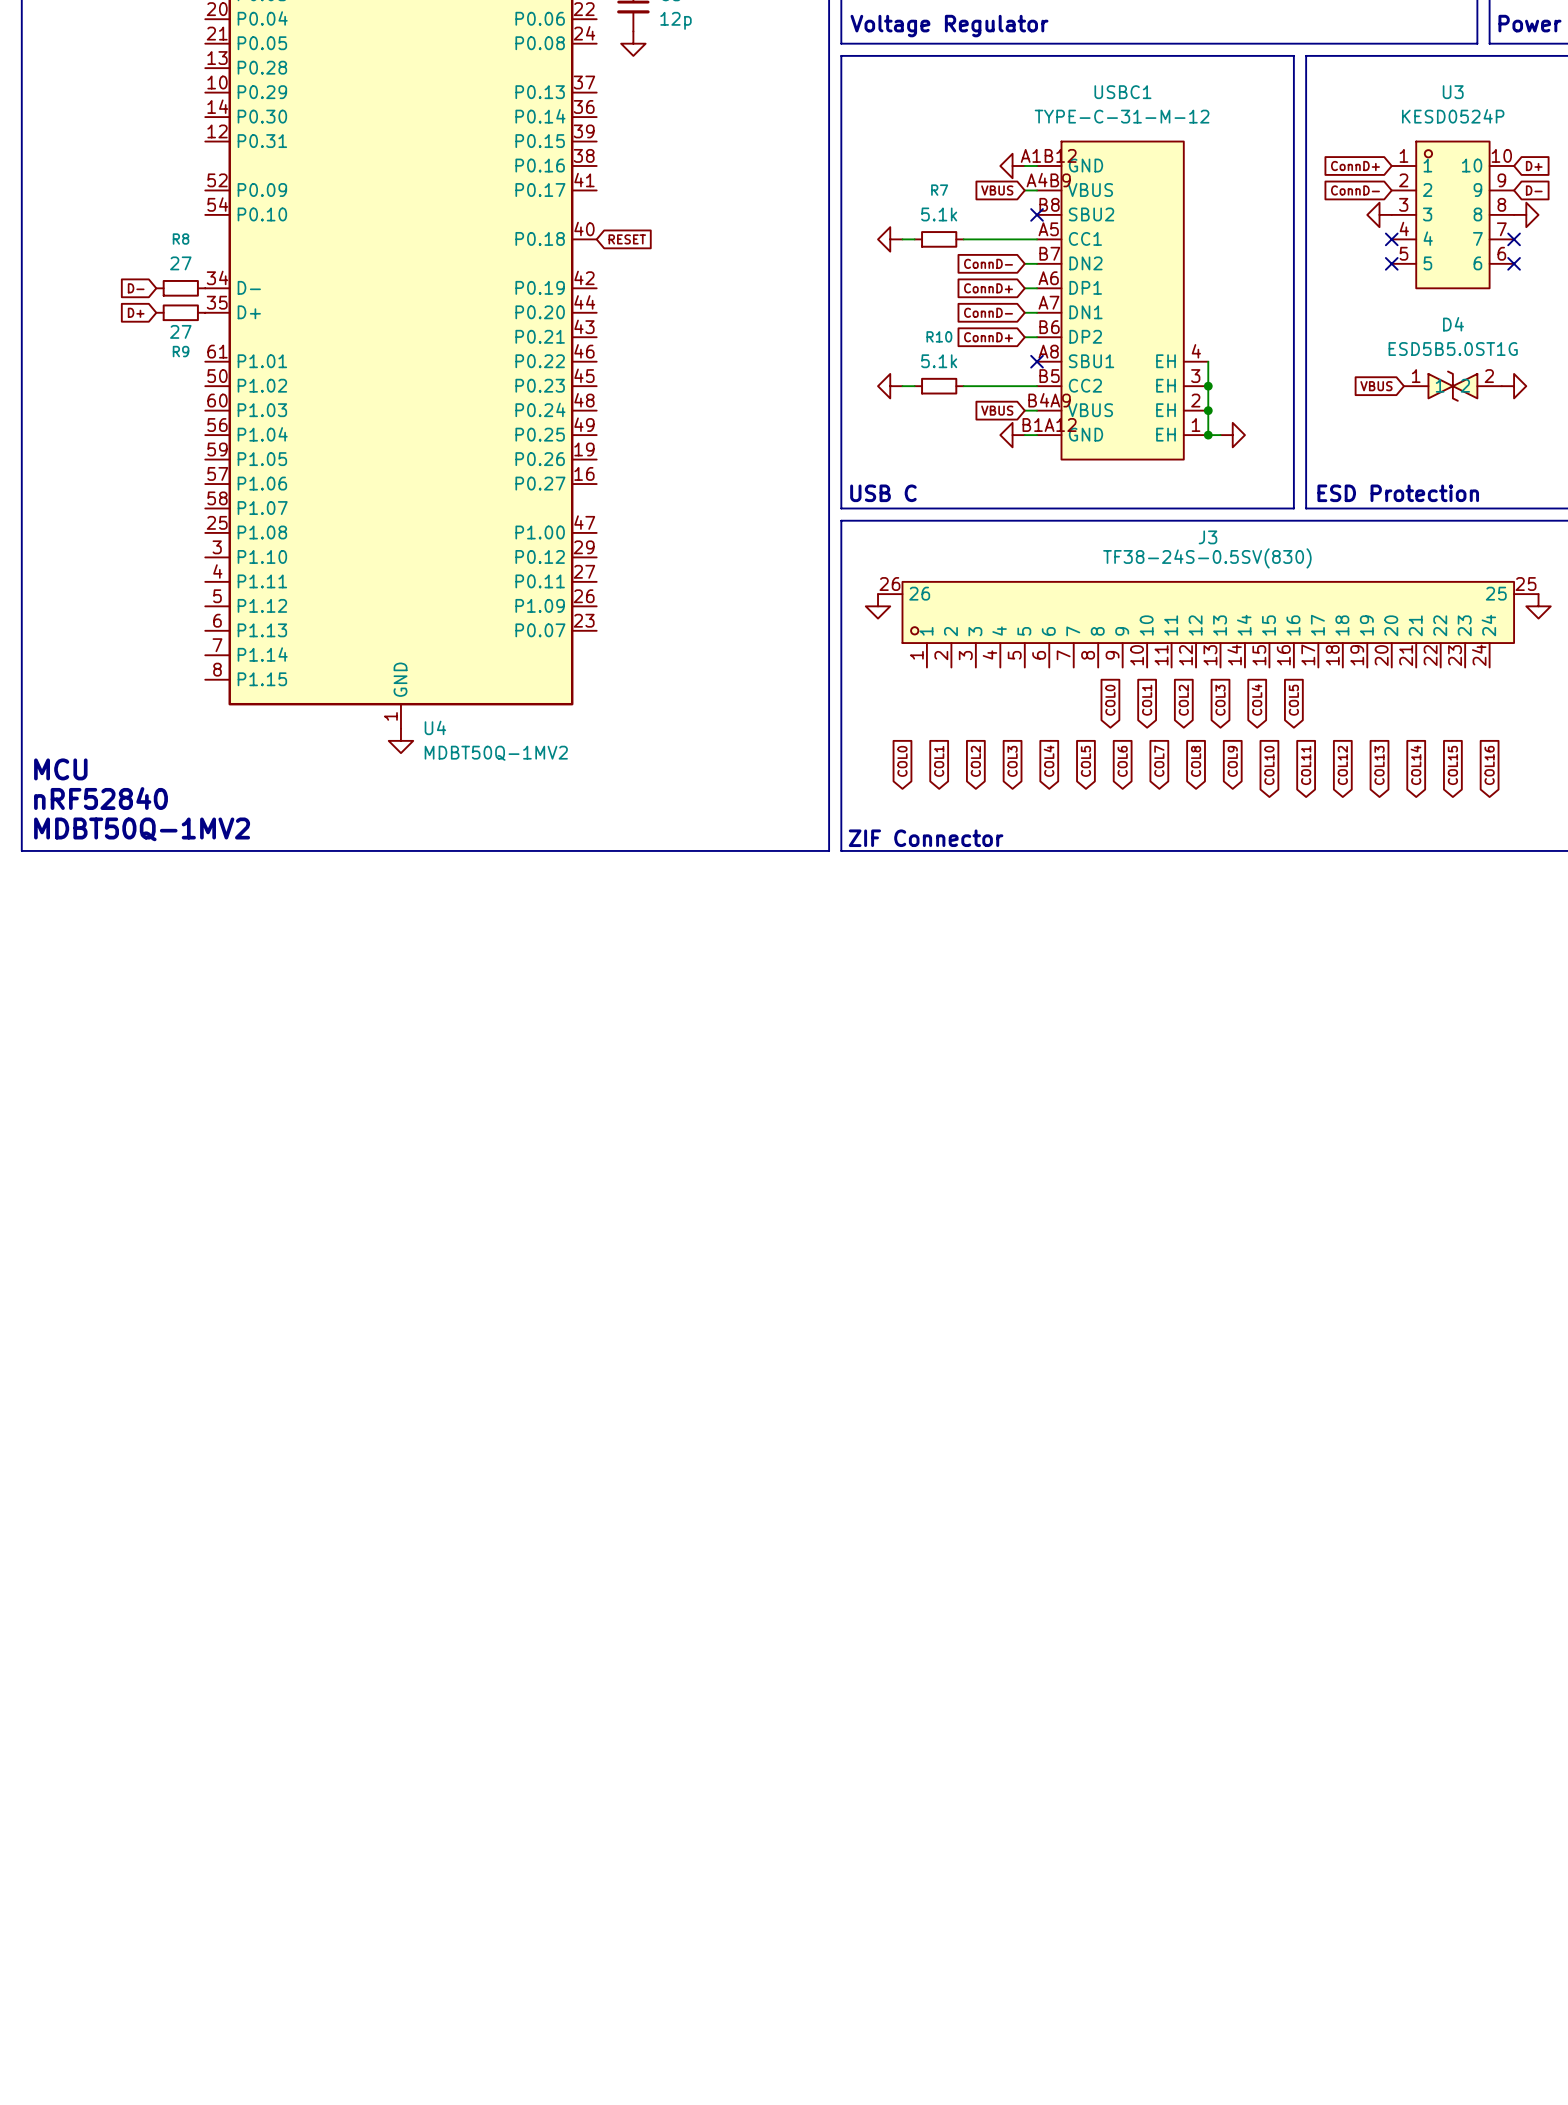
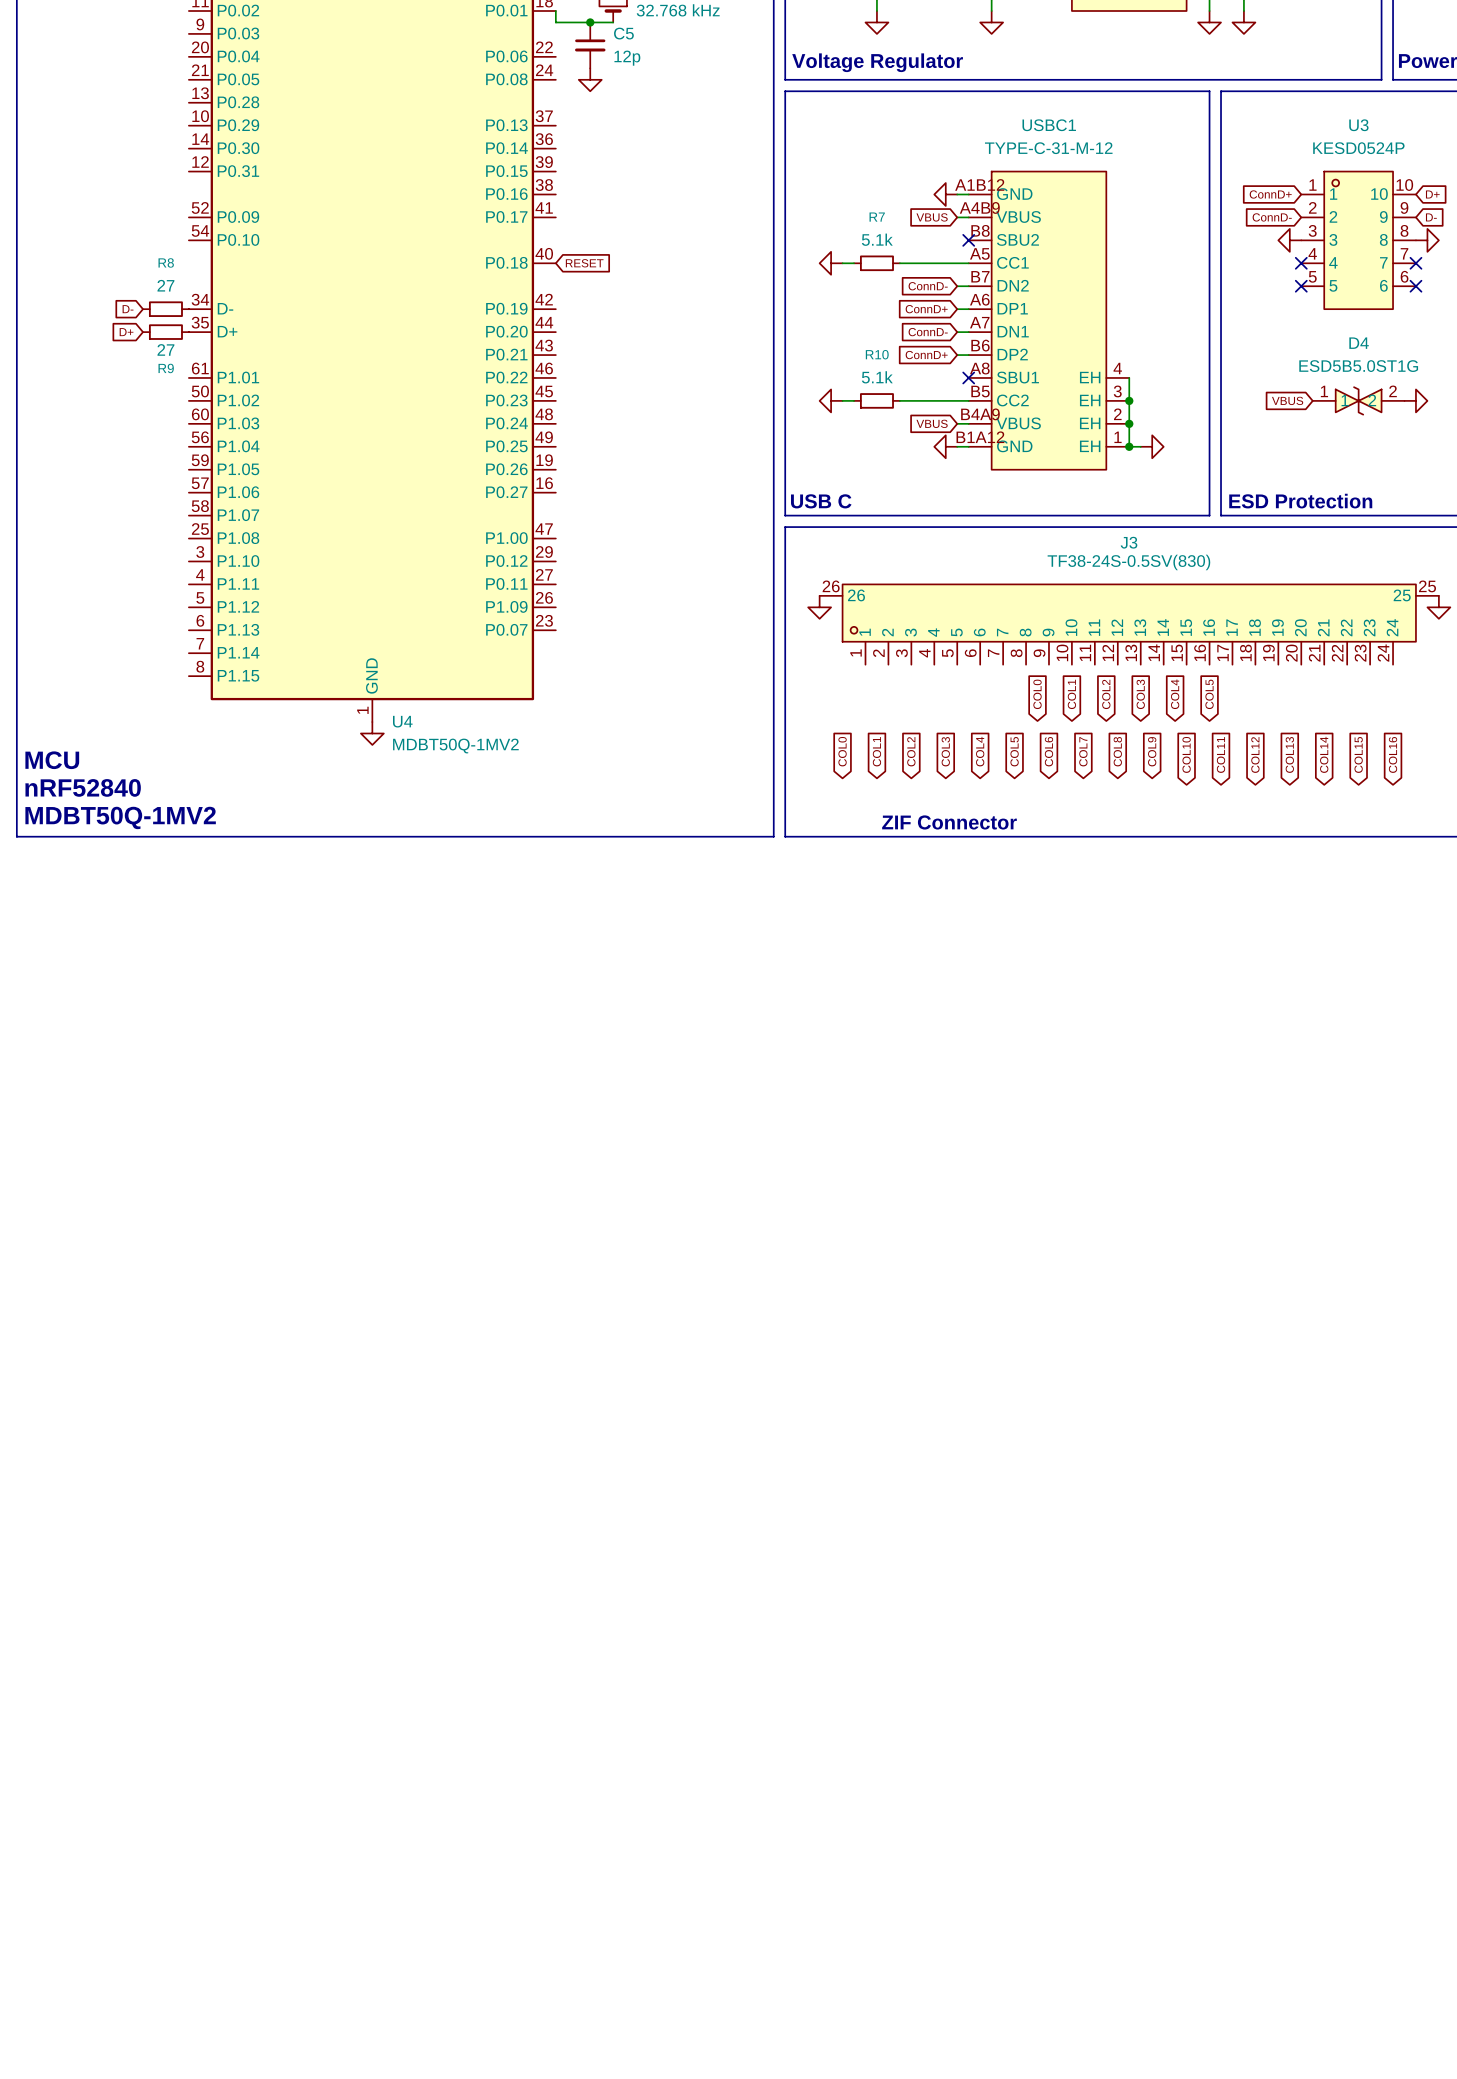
text position: ZIF Connector (926, 838) -> ZIF Connector (949, 822)

